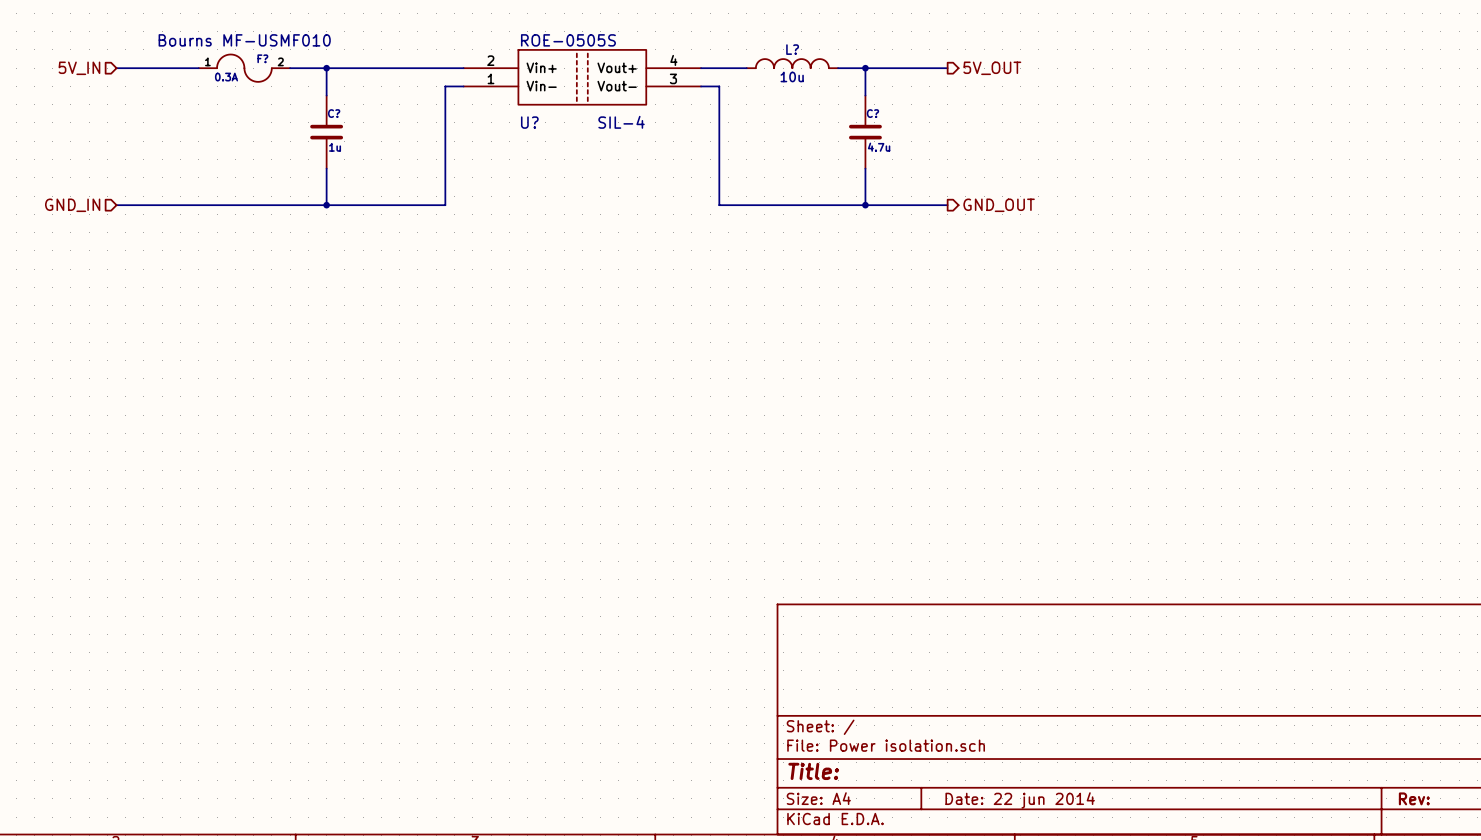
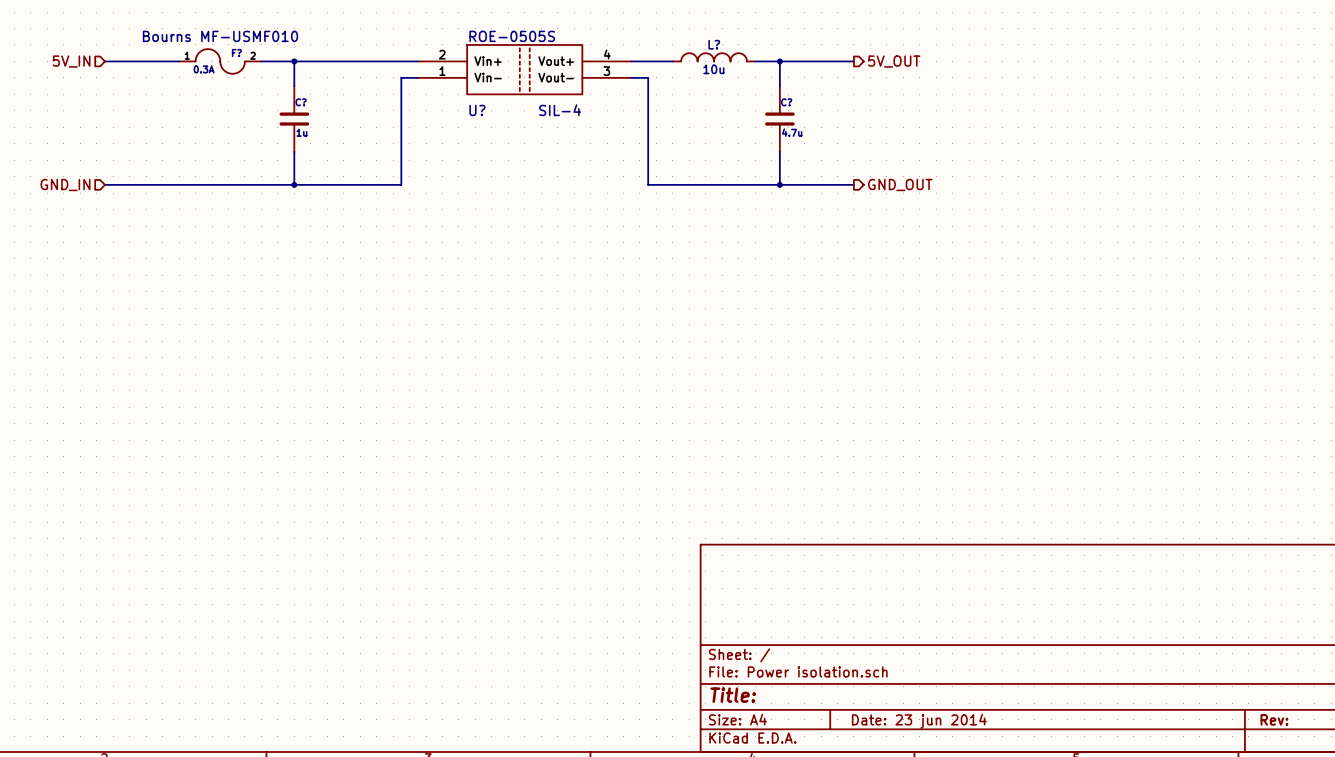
title block: Date: 22 jun 2014 (1020, 800) -> Date: 23 jun 2014 (919, 721)

